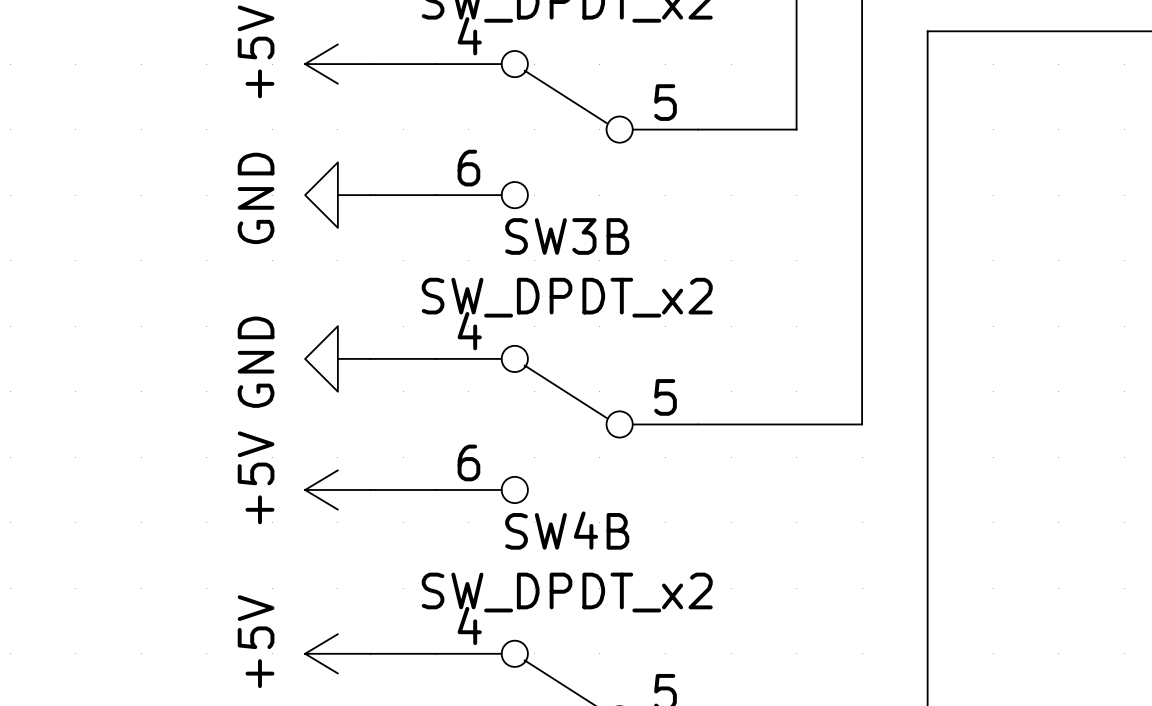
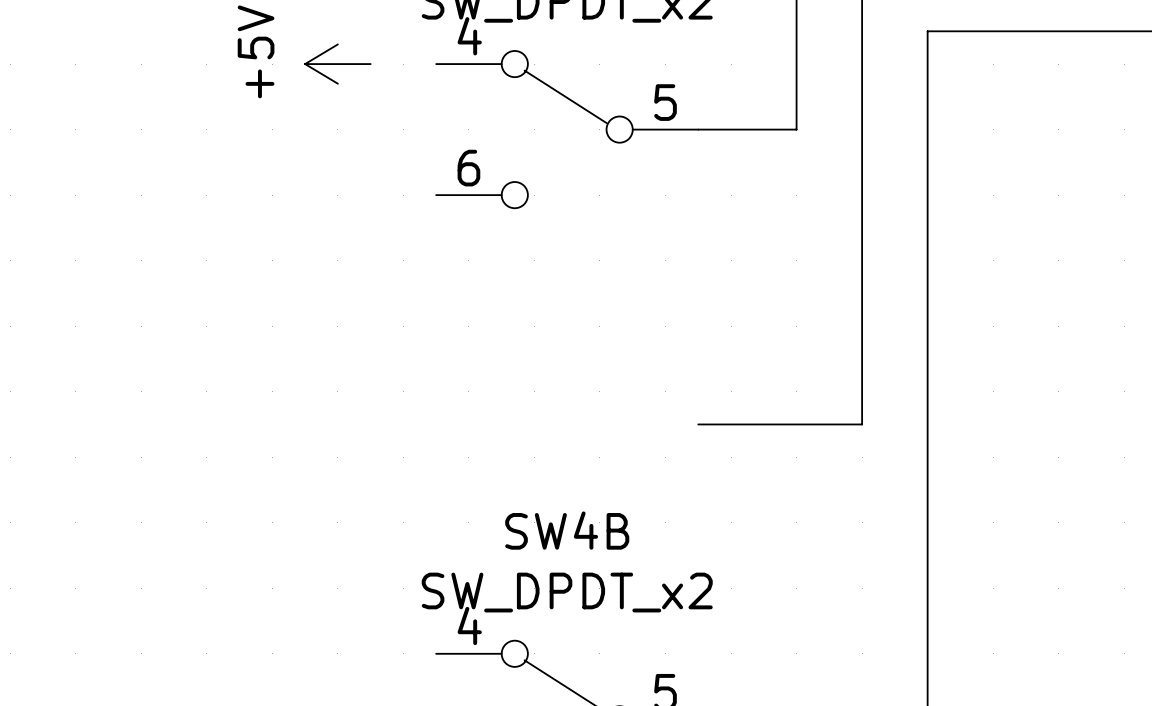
wire: (370, 64) (436, 64) -> none
power symbol: GND (337, 195) -> none
wire: (370, 195) (436, 195) -> none
power symbol: GND (337, 358) -> none
wire: (370, 358) (436, 358) -> none
SW3B: SW_DPDT_x2 (567, 424) -> none
power symbol: +5V (337, 489) -> none
wire: (370, 489) (436, 489) -> none
power symbol: +5V (337, 653) -> none
wire: (370, 653) (436, 653) -> none

